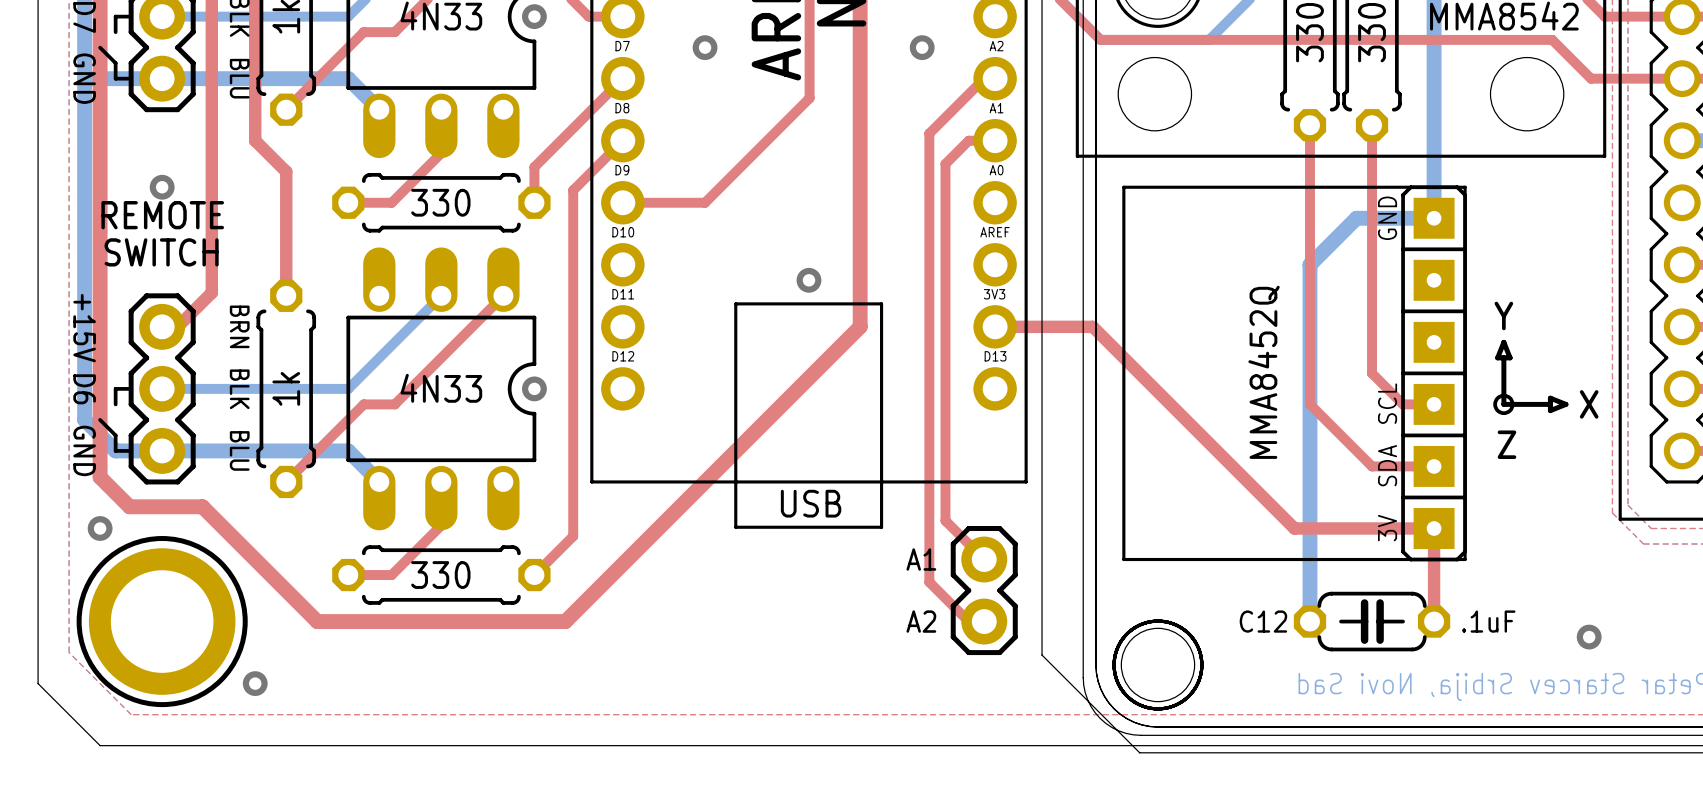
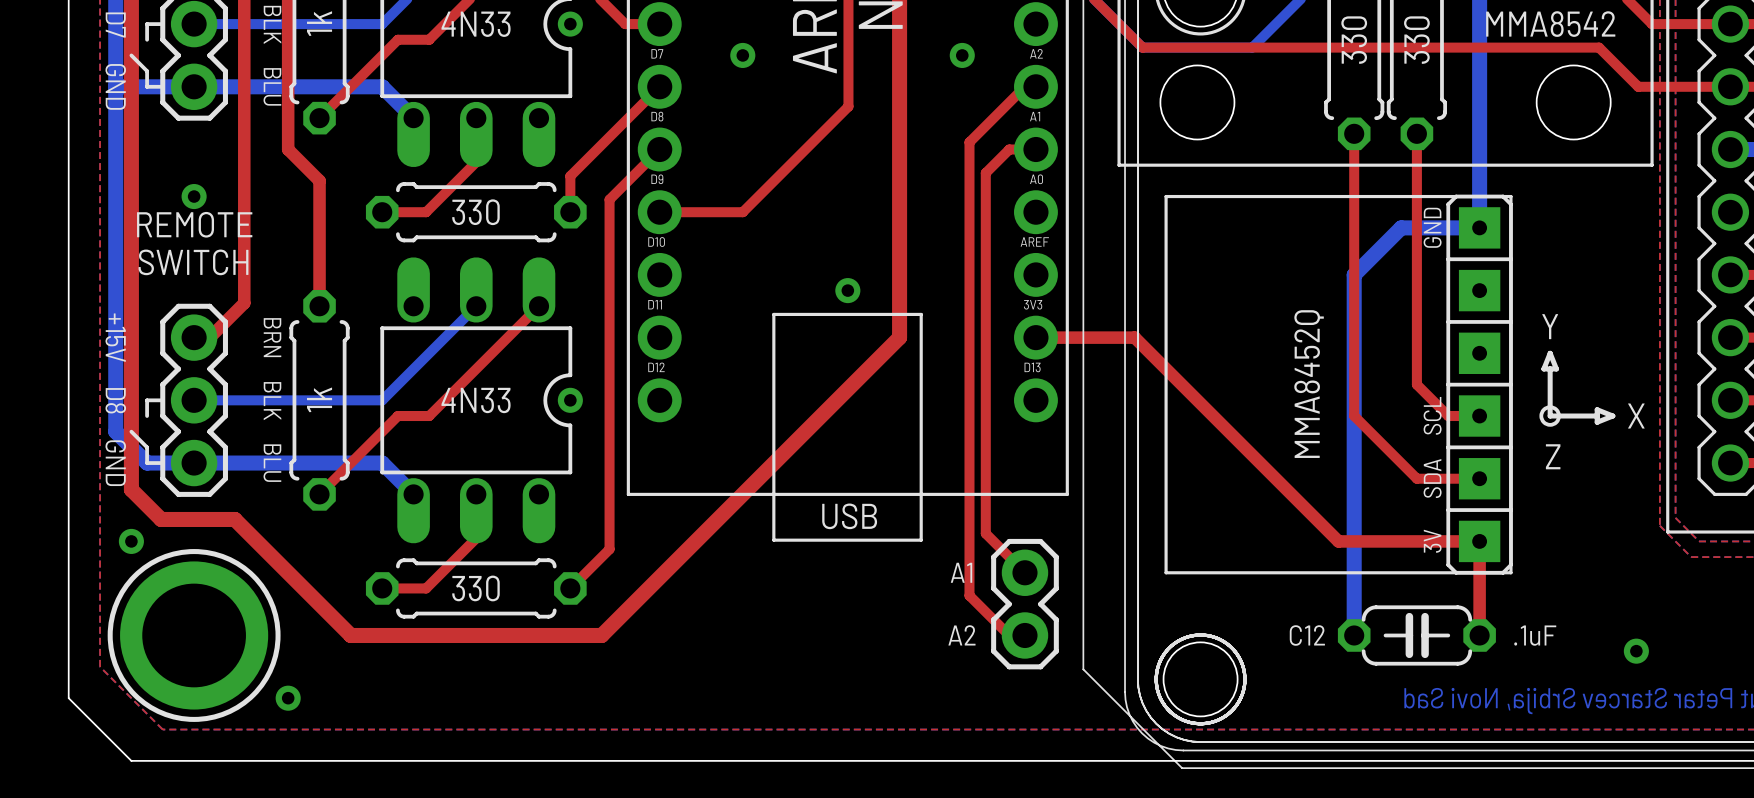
text: D6 (84, 389) -> D8 (115, 400)

